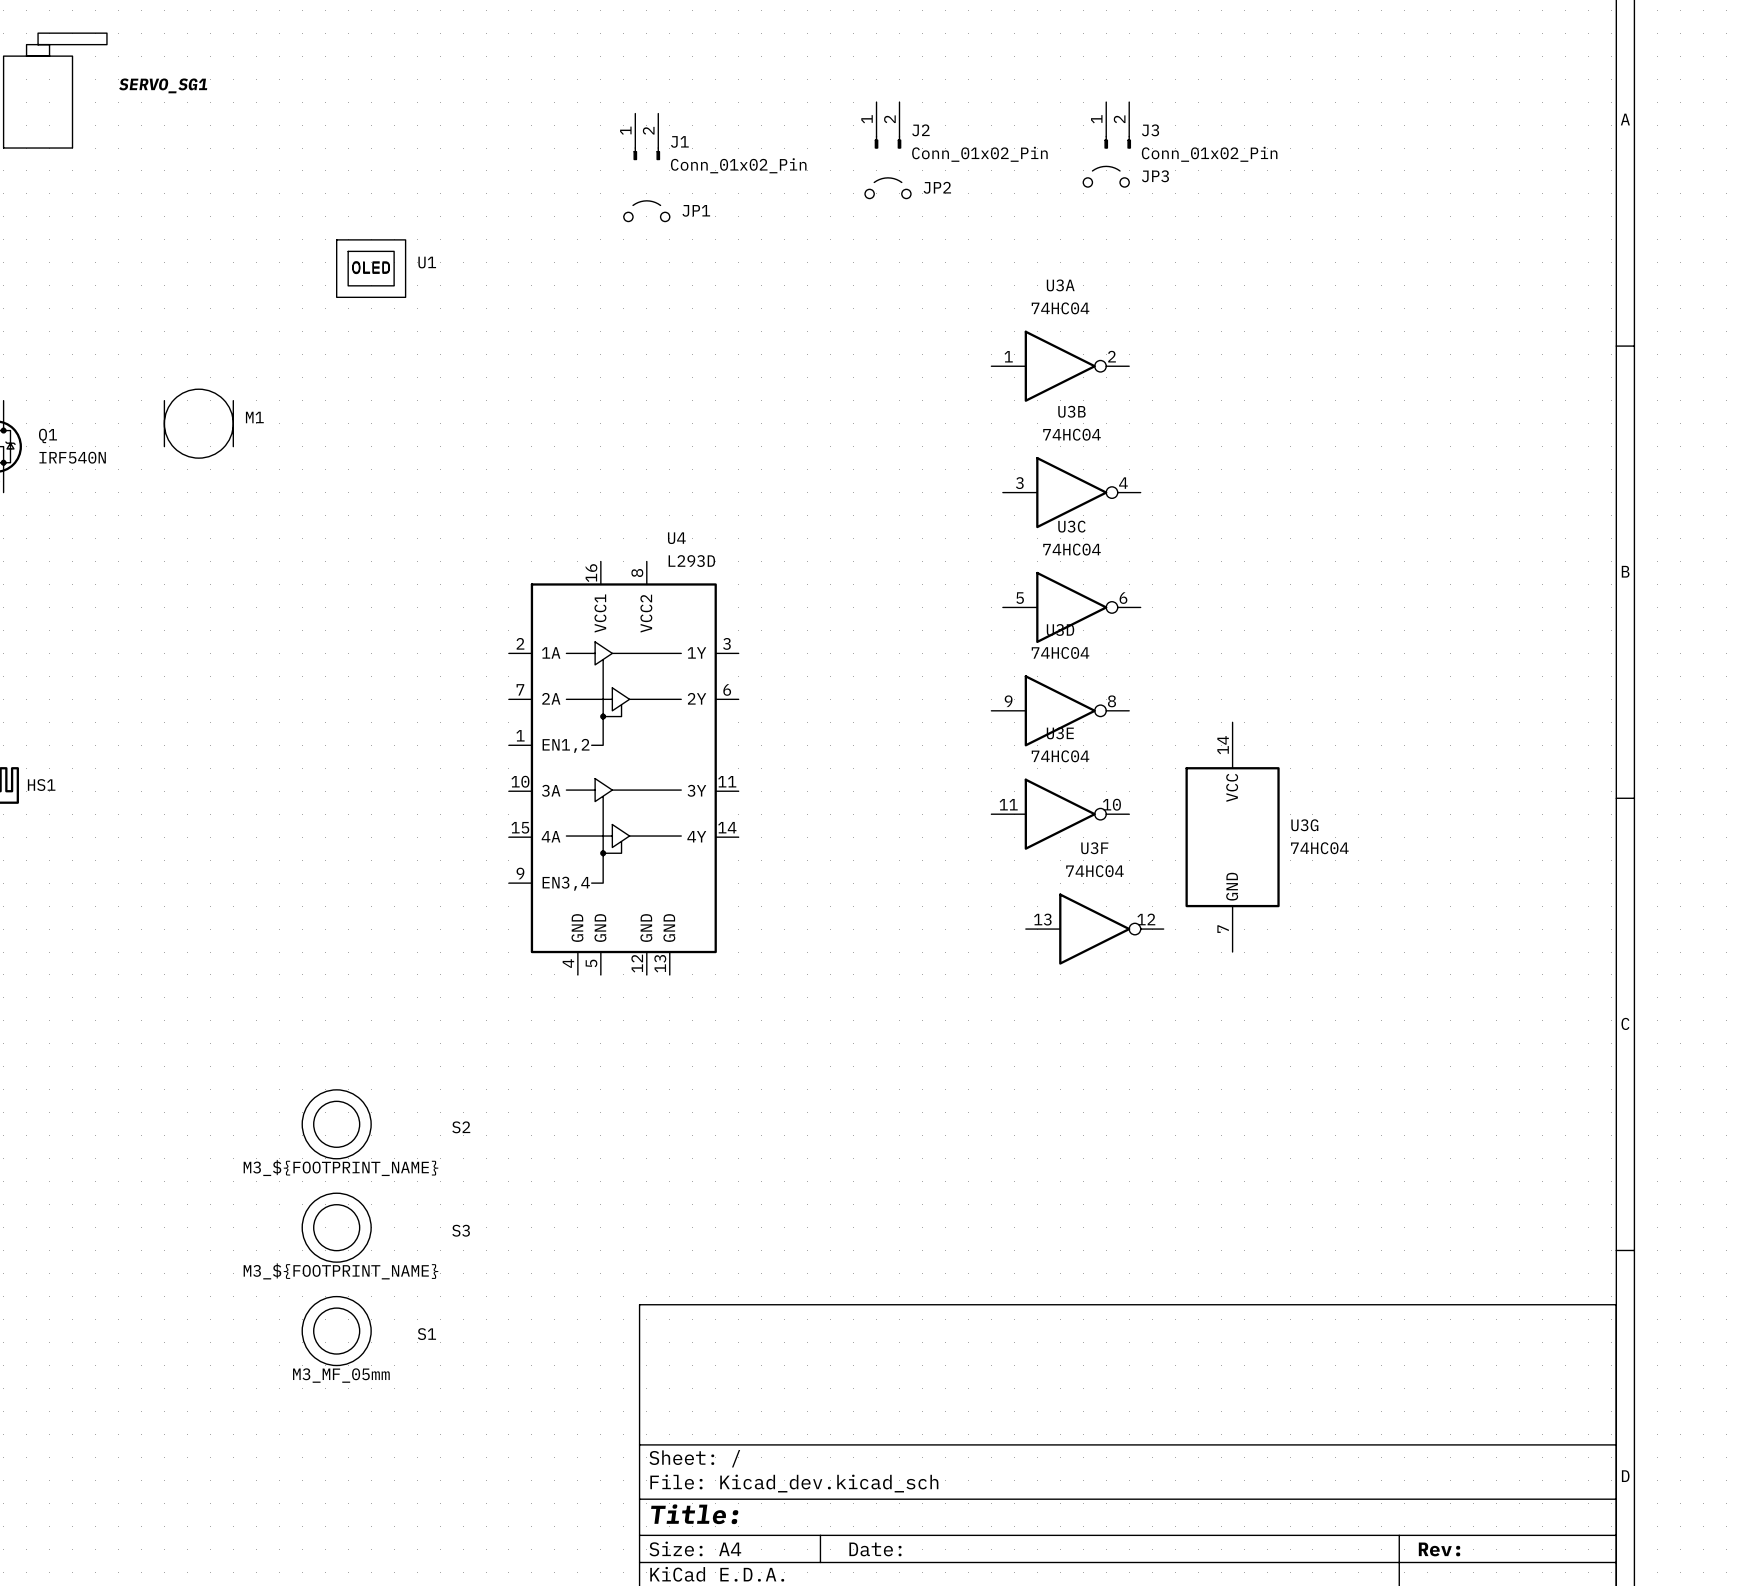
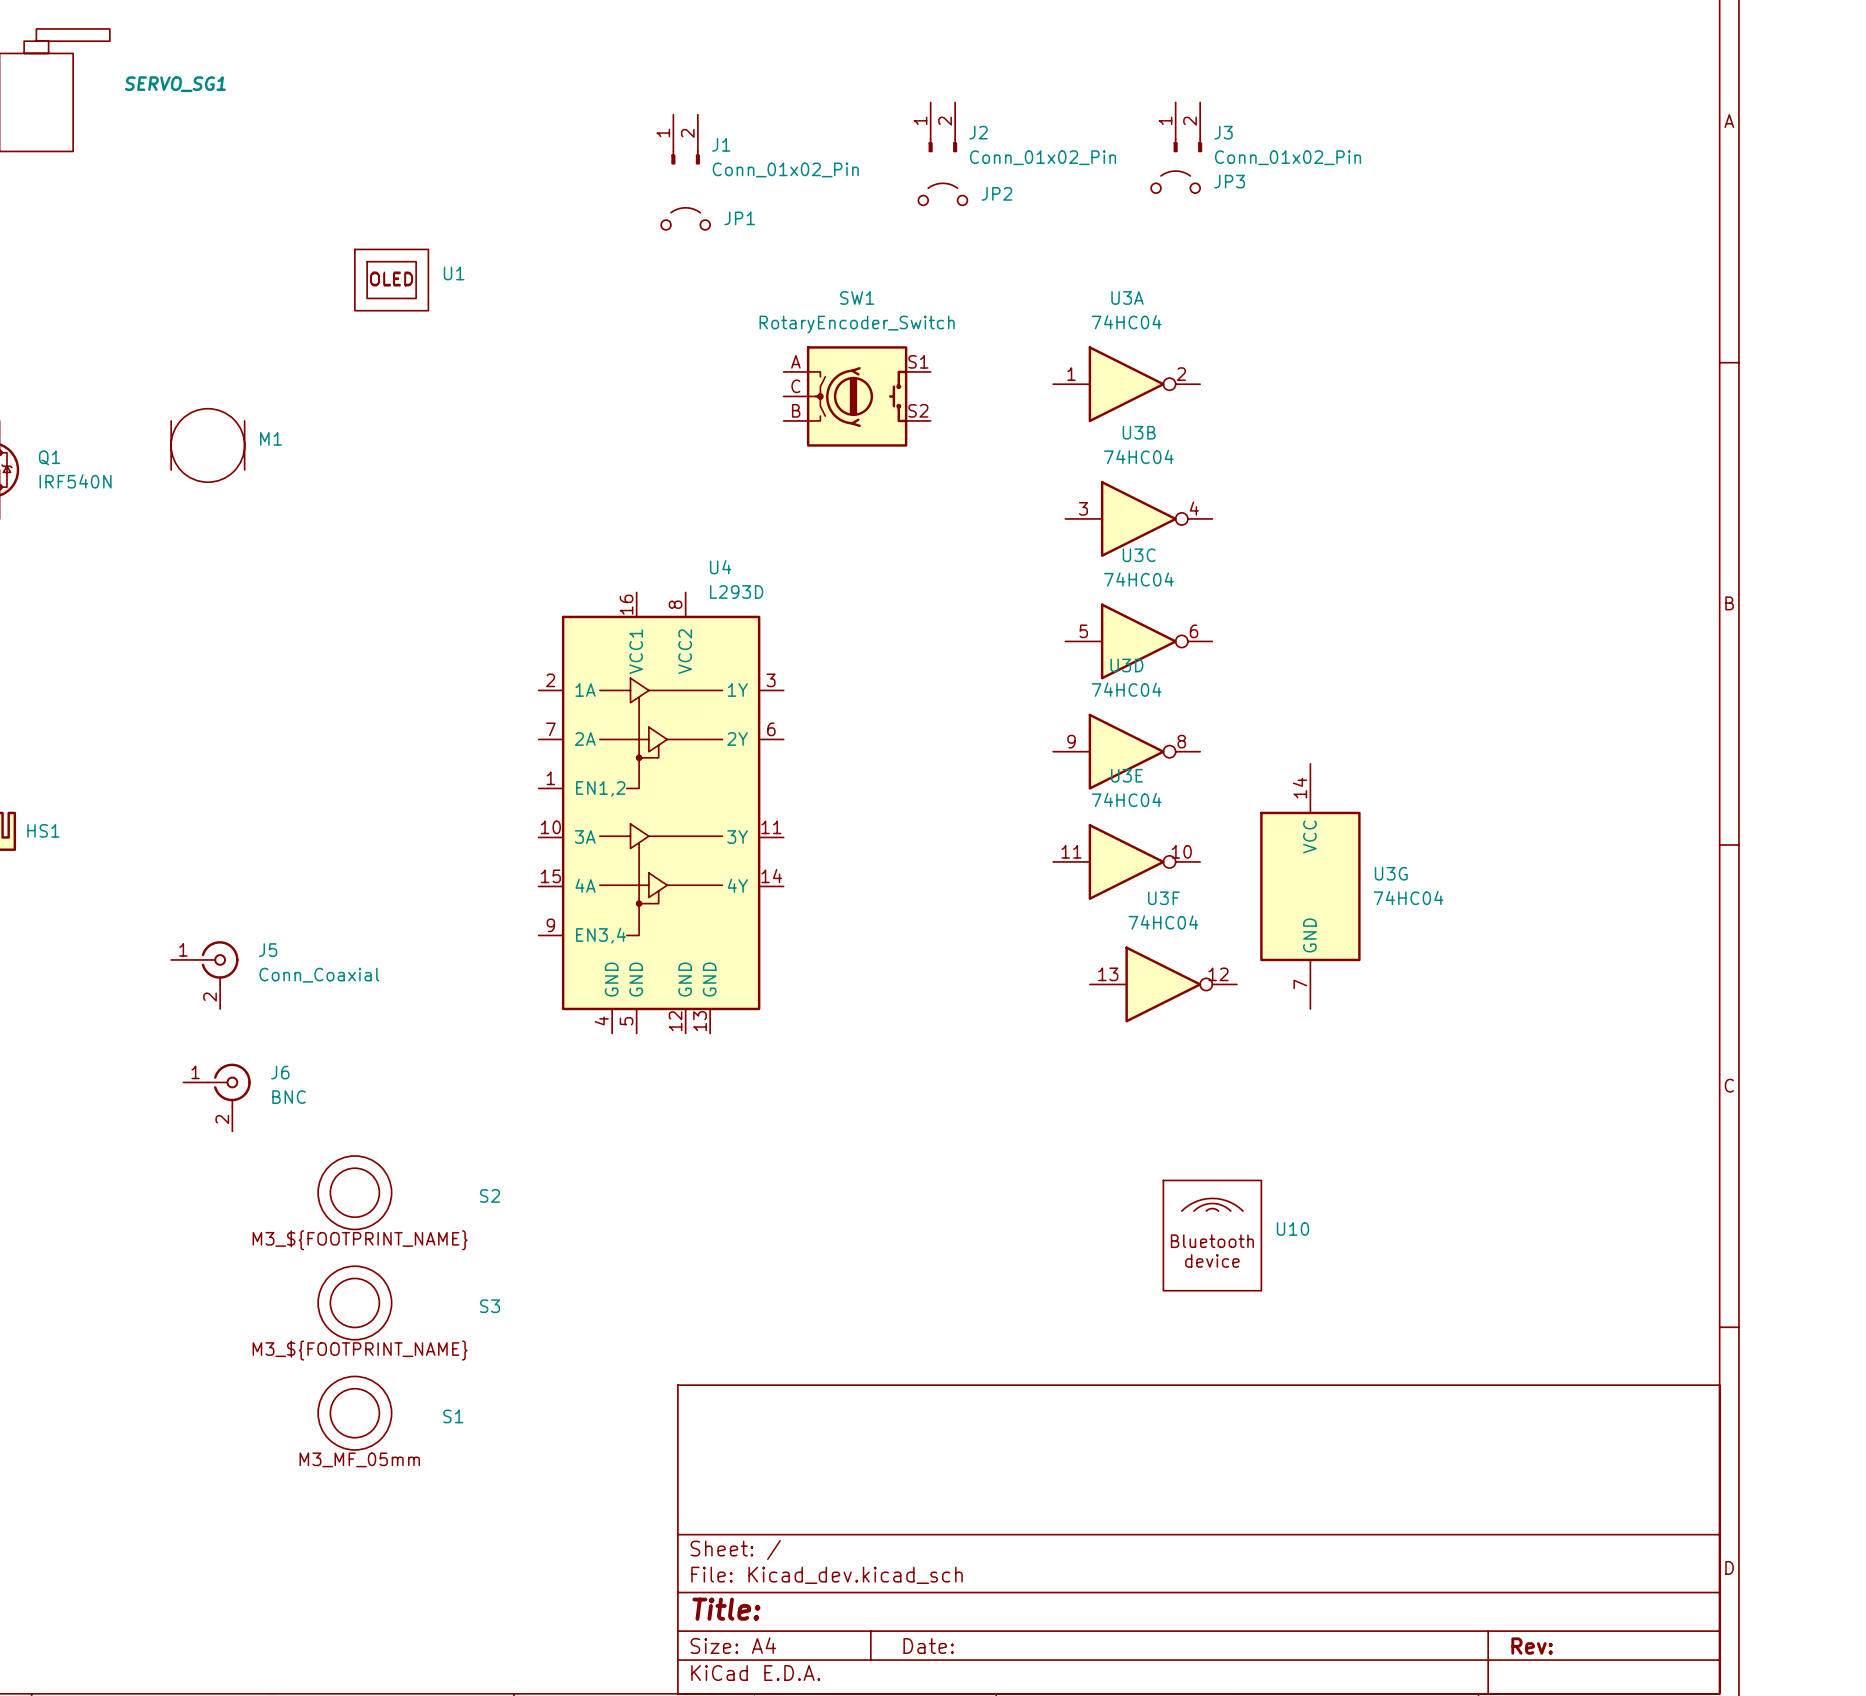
SW1: none -> RotaryEncoder_Switch (857, 396)
J5: none -> Conn_Coaxial (204, 975)
J6: none -> BNC (217, 1097)
U10: none -> (1212, 1235)

